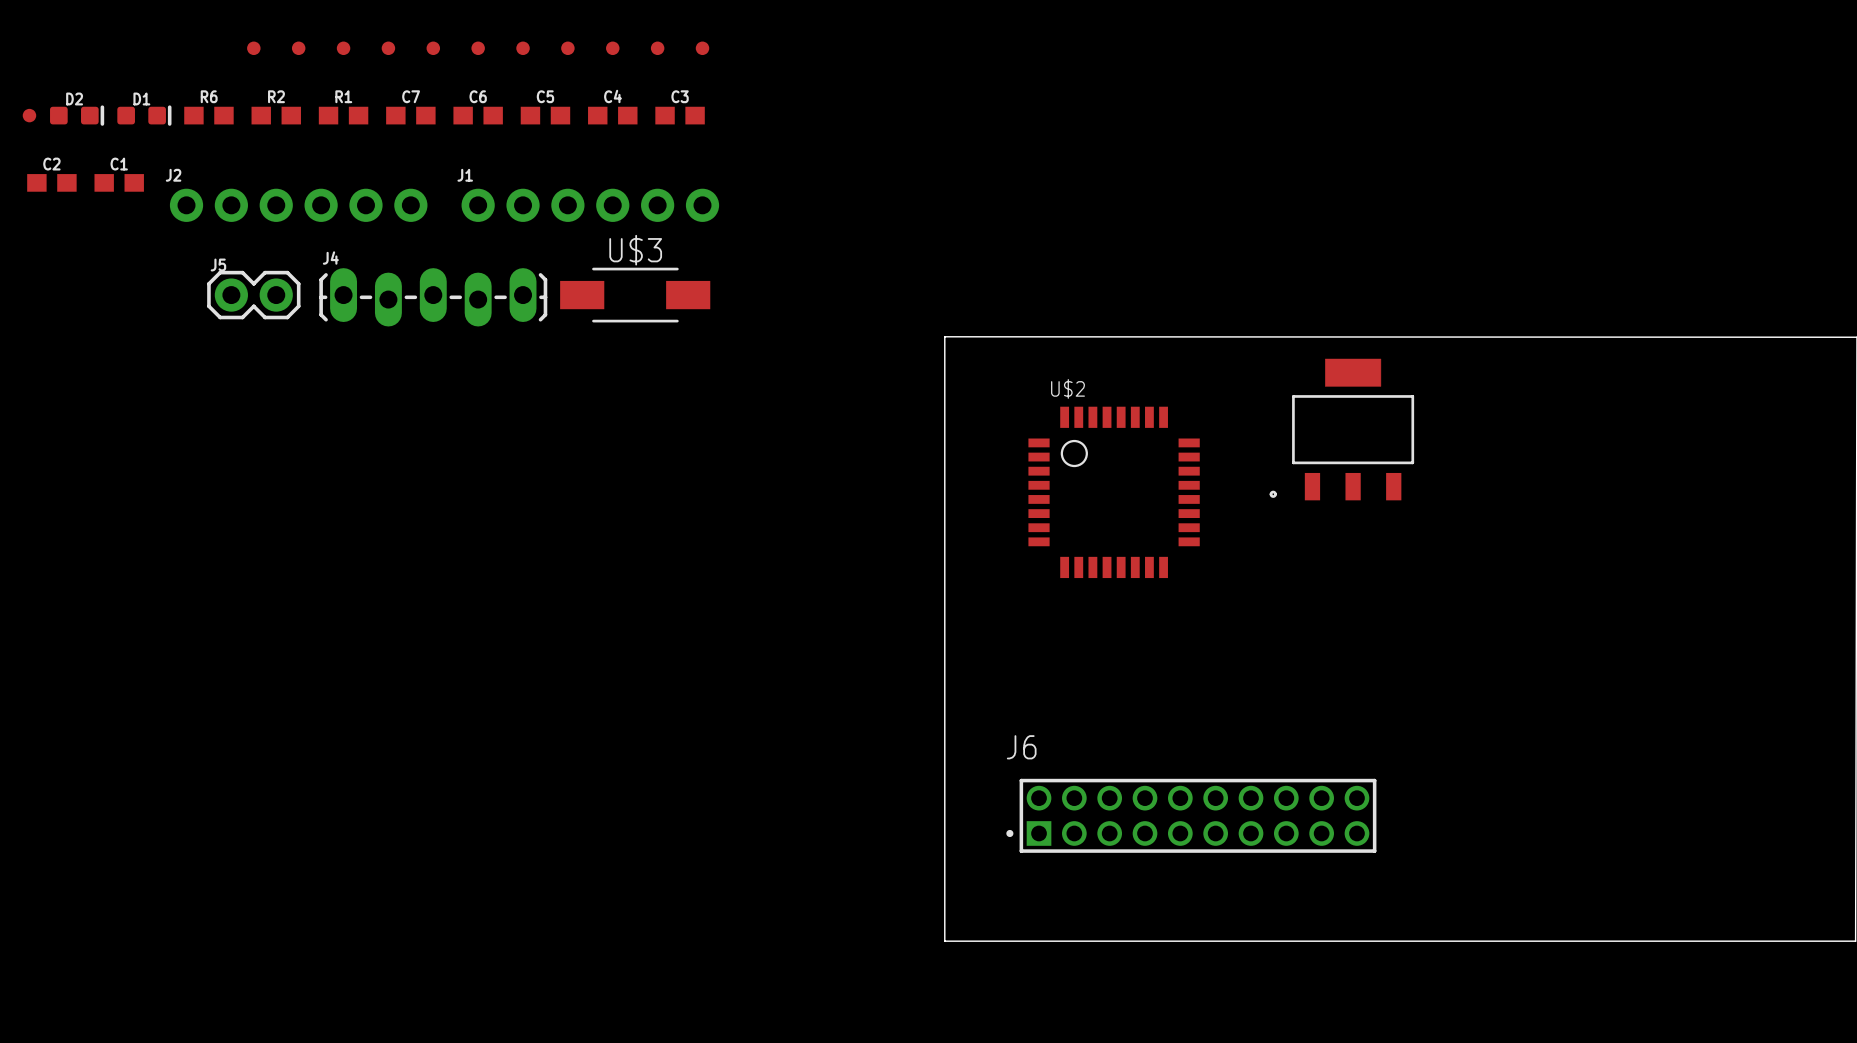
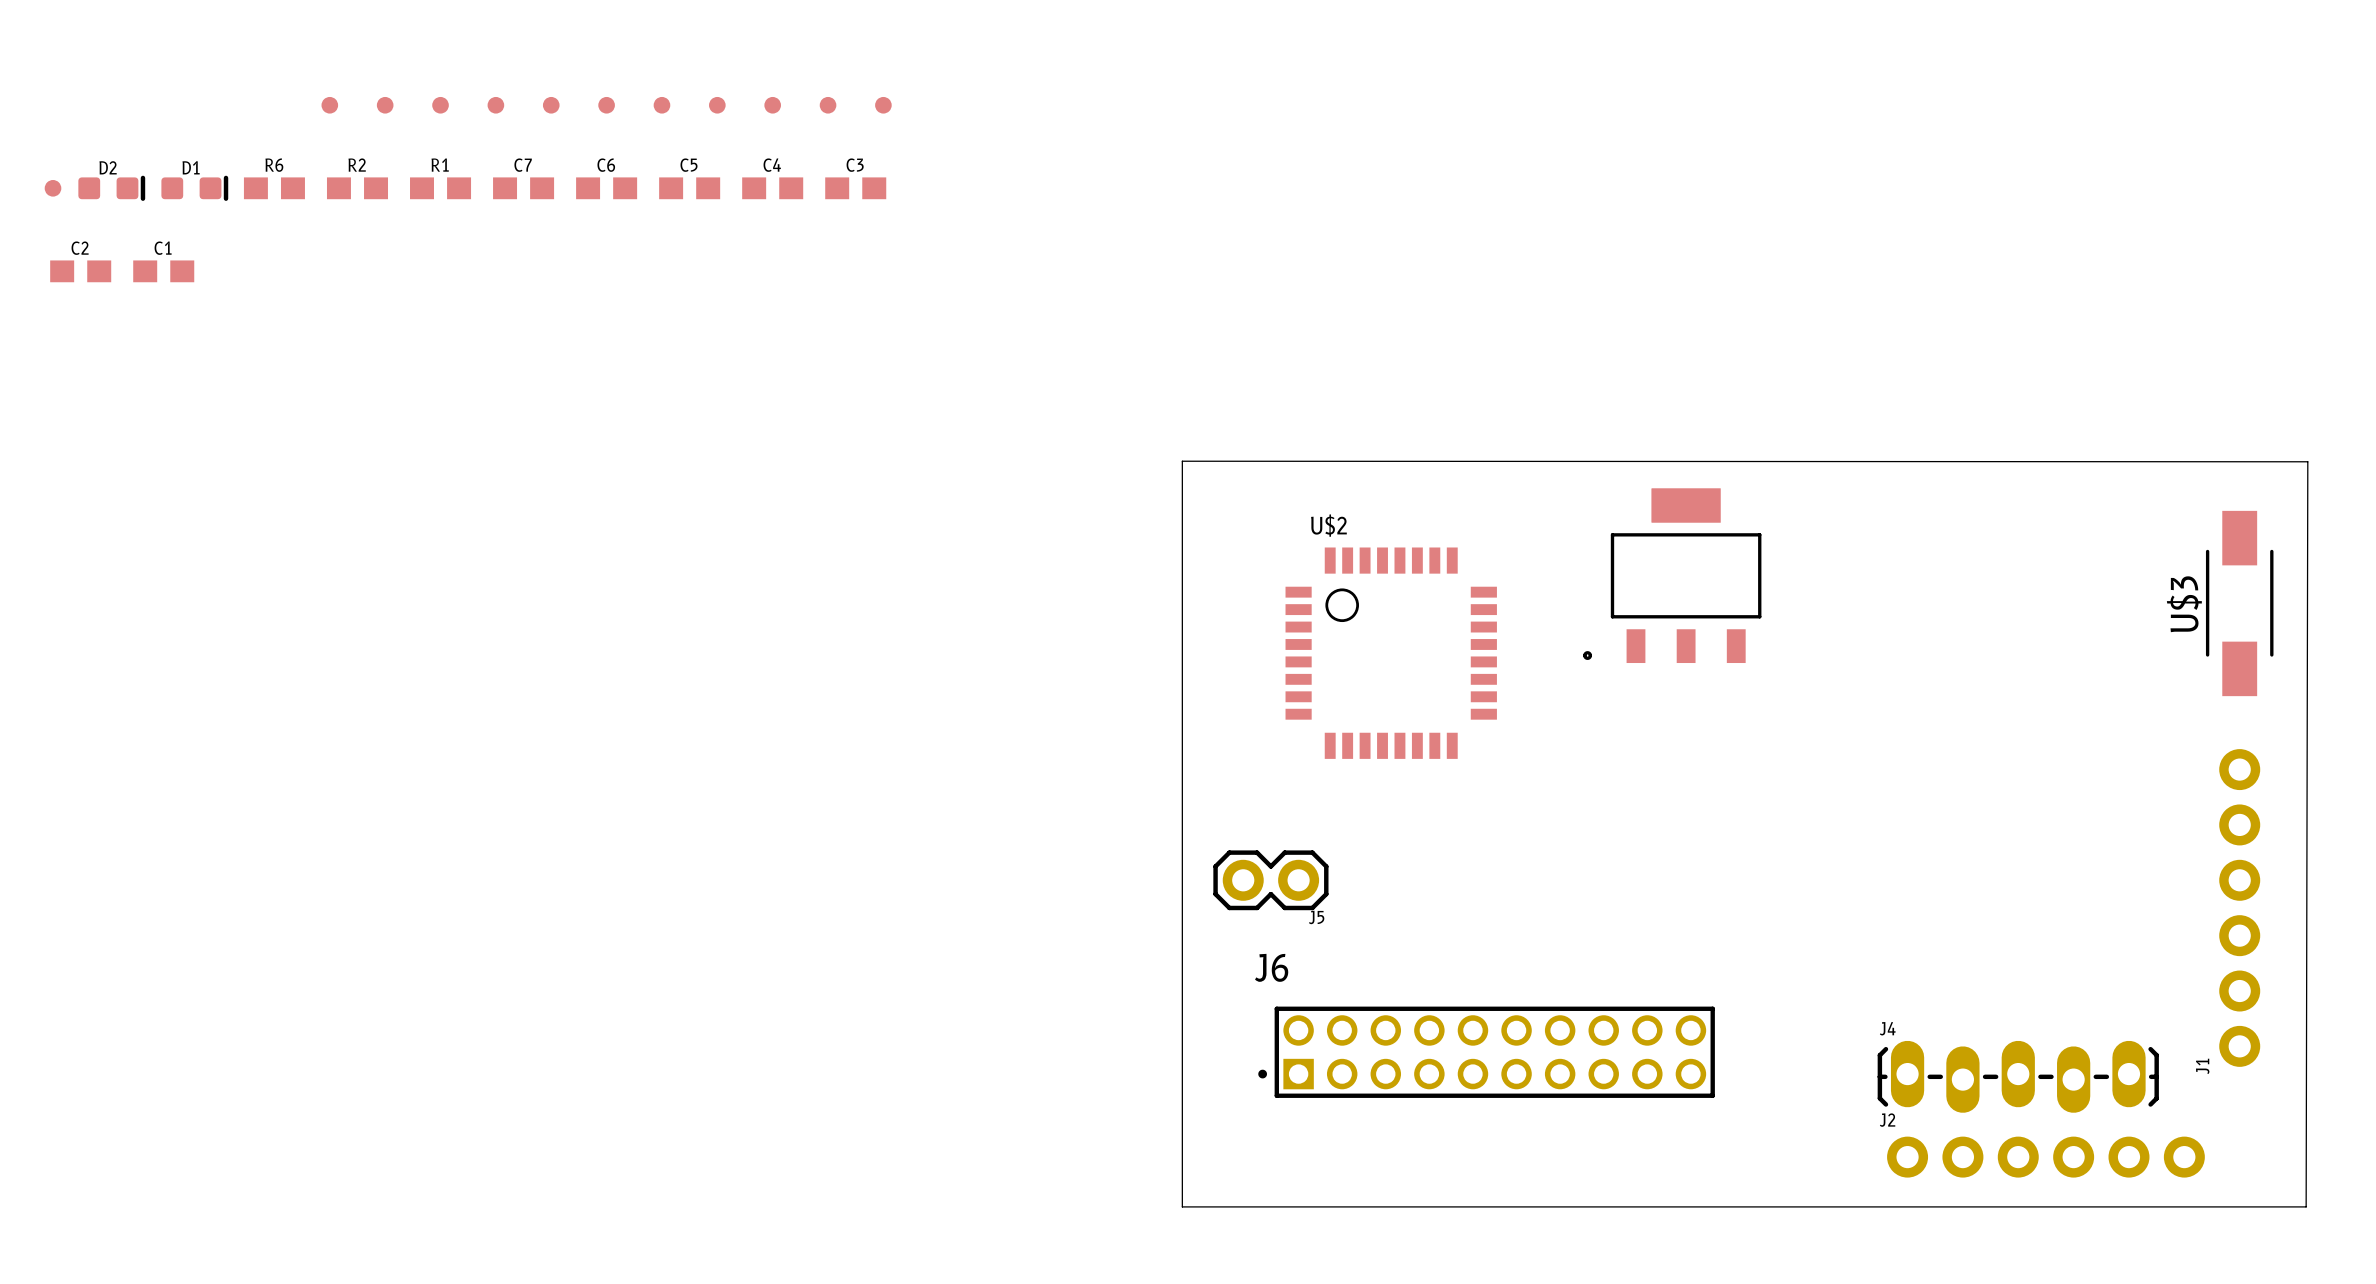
J1 name position: J1 (465, 175) -> J1 (2202, 1066)
J2 position: (298, 205) -> (2045, 1157)
J1 rotation: 0° (590, 205) -> 90° clockwise (2239, 907)
J1 position: (590, 205) -> (2239, 907)
U$3 name position: U$3 (635, 250) -> U$3 (2184, 604)
J5 name position: J5 (218, 265) -> J5 (1316, 917)
J5 position: (253, 295) -> (1270, 880)
U$3 rotation: 0° (635, 295) -> 90° clockwise (2239, 603)
U$3 position: (635, 295) -> (2239, 603)
J4 position: (433, 297) -> (2018, 1076)

